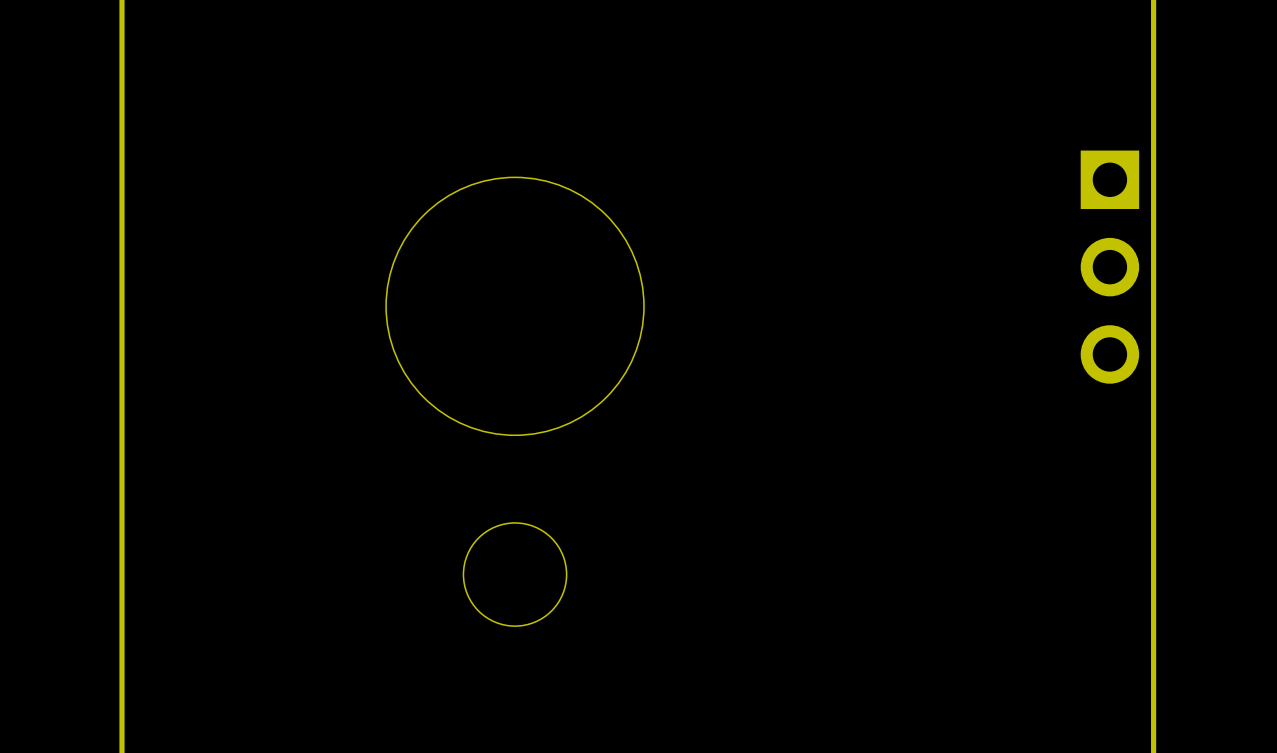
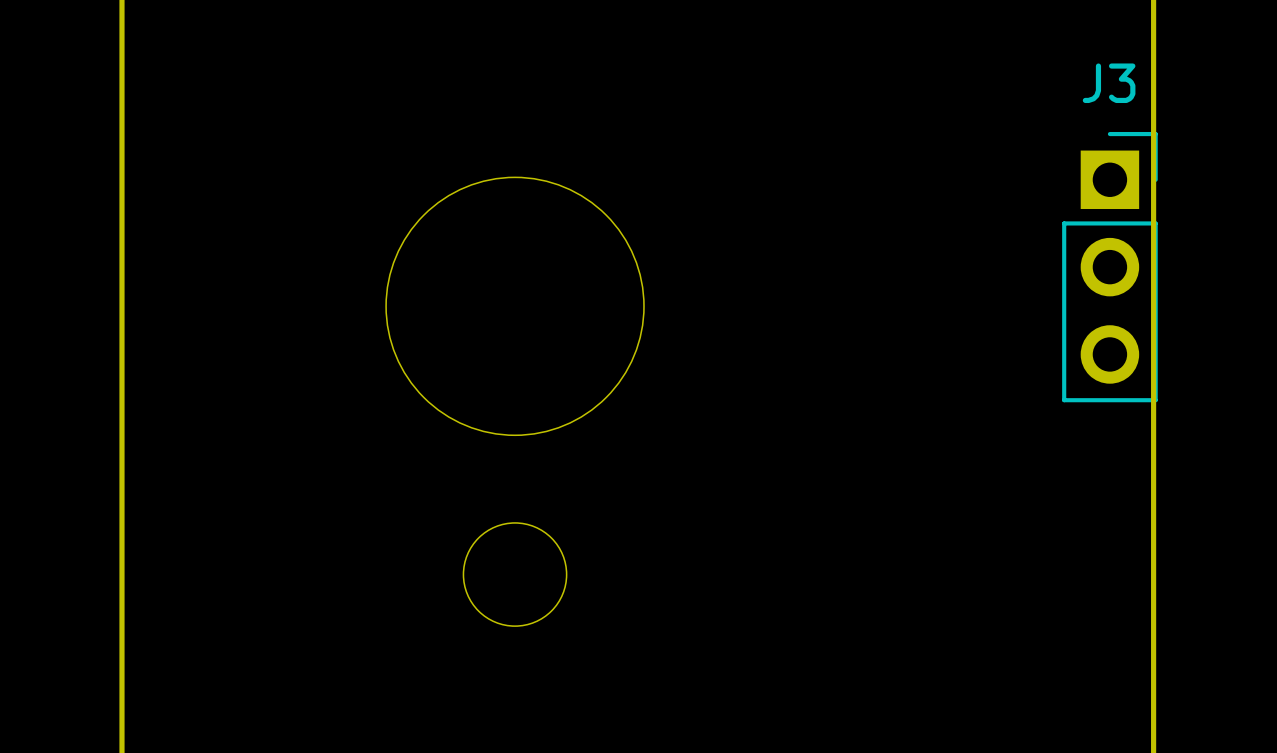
J3 side: bottom (1109, 267) -> top (1109, 267)

